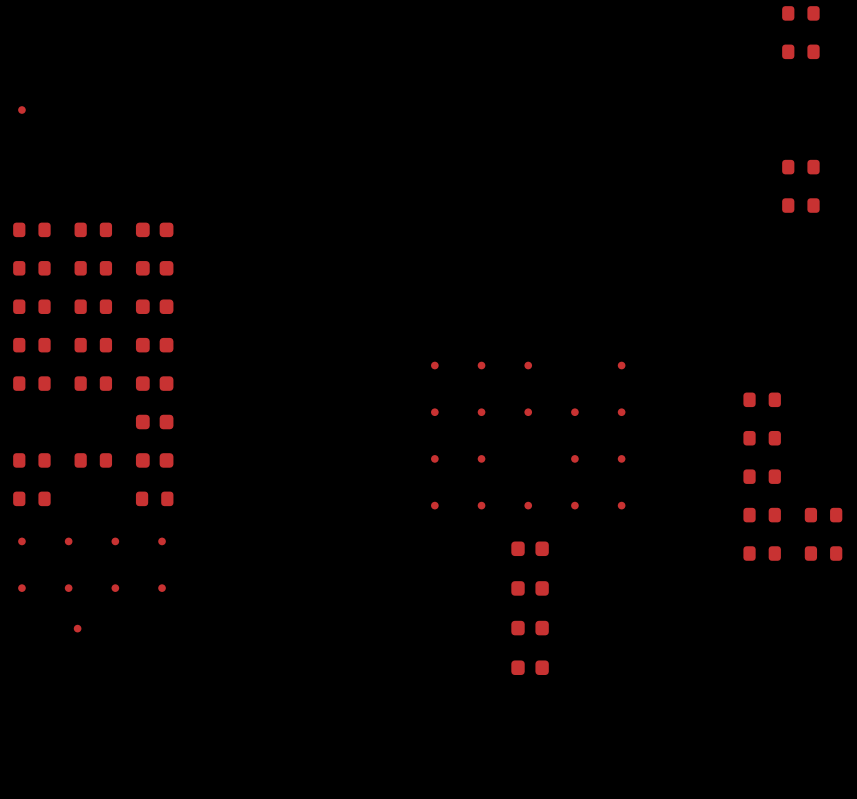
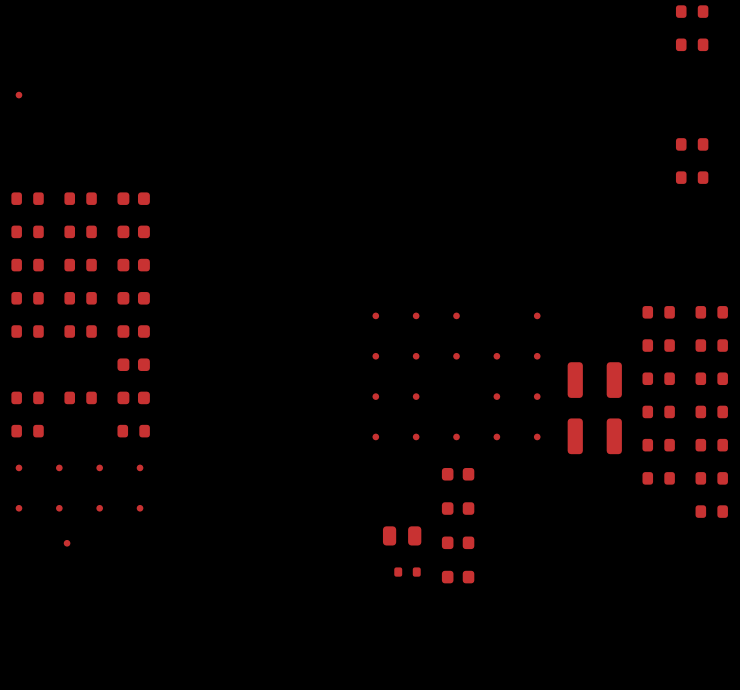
part: none -> (658, 312)
part: none -> (711, 312)
part: none -> (711, 345)
part: none -> (711, 378)
part: none -> (594, 380)
part: none -> (711, 411)
part: none -> (594, 436)
part: none -> (711, 511)
part: none -> (402, 535)
part: none -> (407, 572)

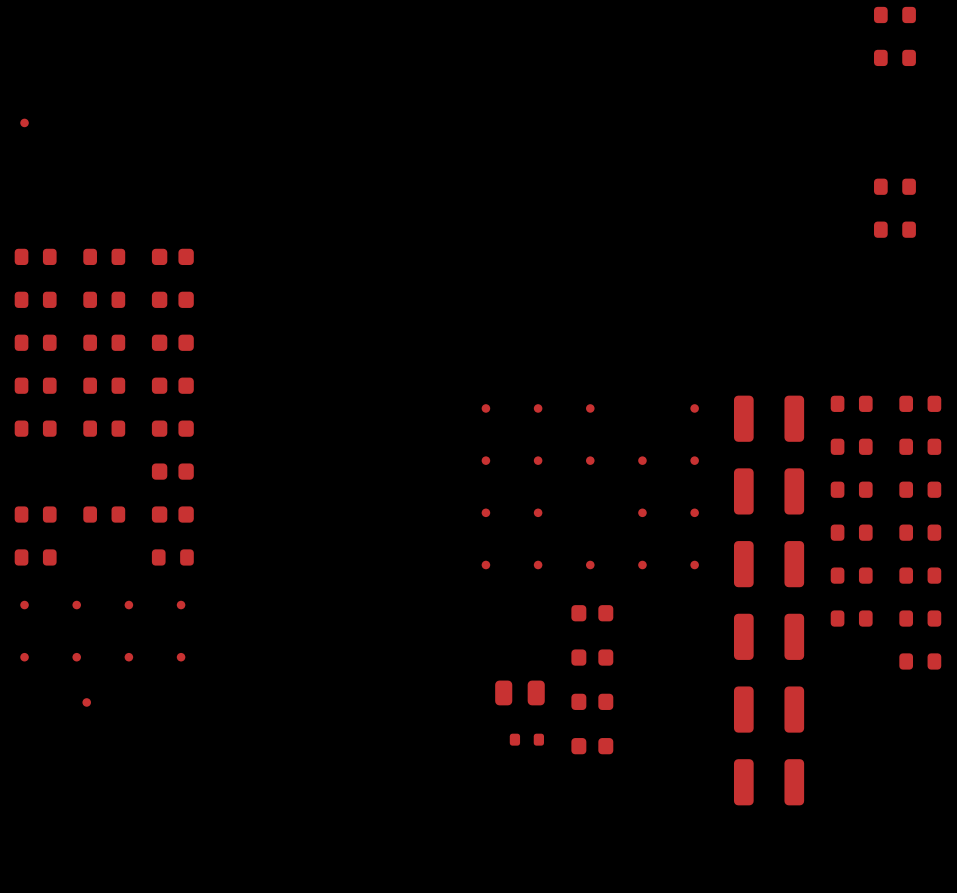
part: none -> (769, 418)
part: none -> (769, 636)
part: none -> (769, 709)
part: none -> (769, 782)

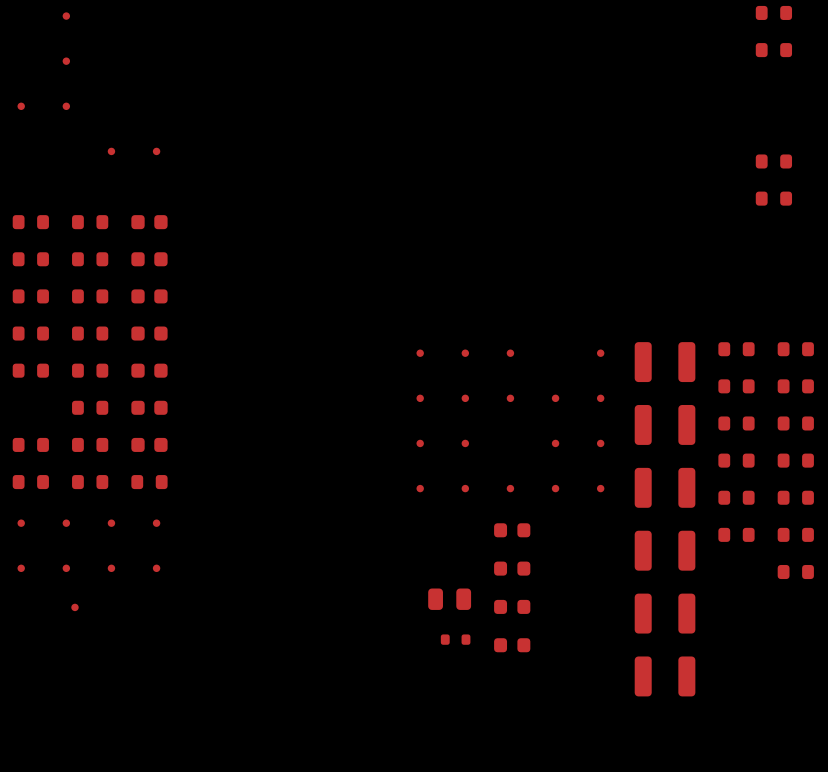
part: none -> (66, 16)
part: none -> (66, 61)
part: none -> (66, 106)
part: none -> (111, 151)
part: none -> (156, 151)
part: none -> (90, 407)
part: none -> (90, 482)

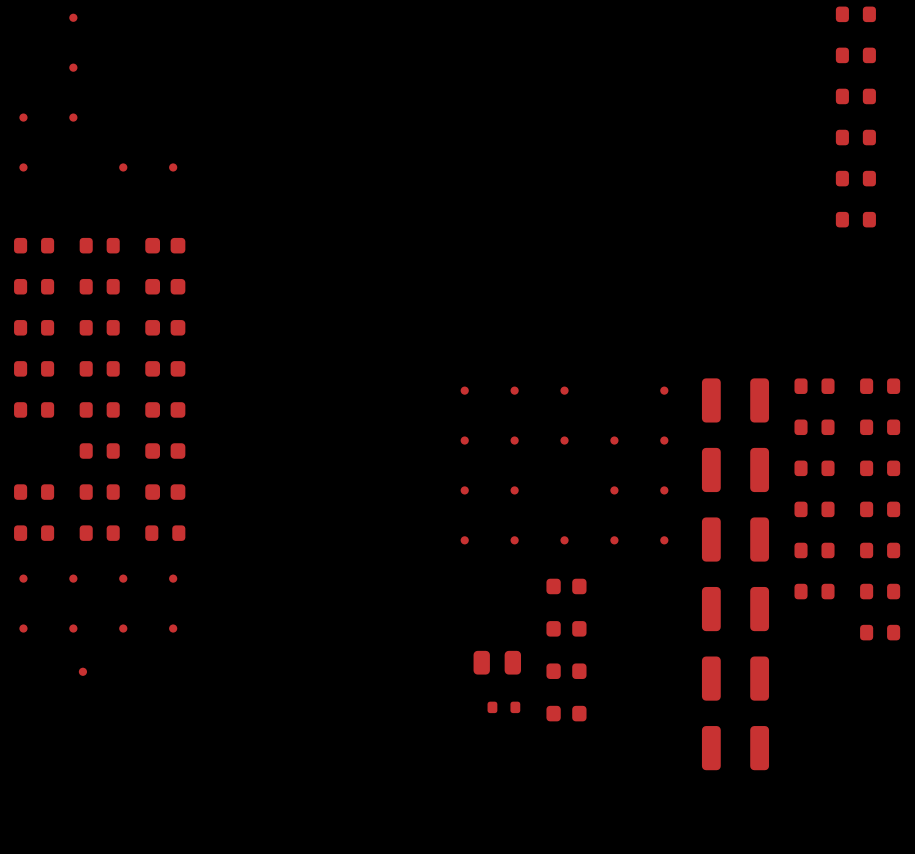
part: none -> (855, 96)
part: none -> (855, 137)
part: none -> (23, 167)

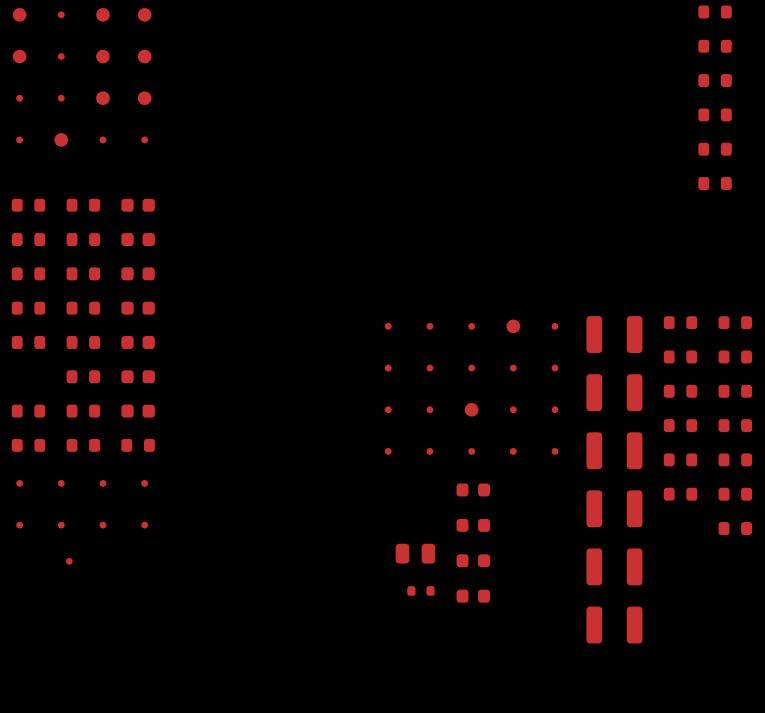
part: none -> (19, 14)
part: none -> (102, 14)
part: none -> (144, 14)
part: none -> (19, 56)
part: none -> (102, 56)
part: none -> (144, 56)
part: none -> (102, 98)
part: none -> (144, 98)
part: none -> (61, 139)
part: none -> (513, 326)
part: none -> (471, 409)

